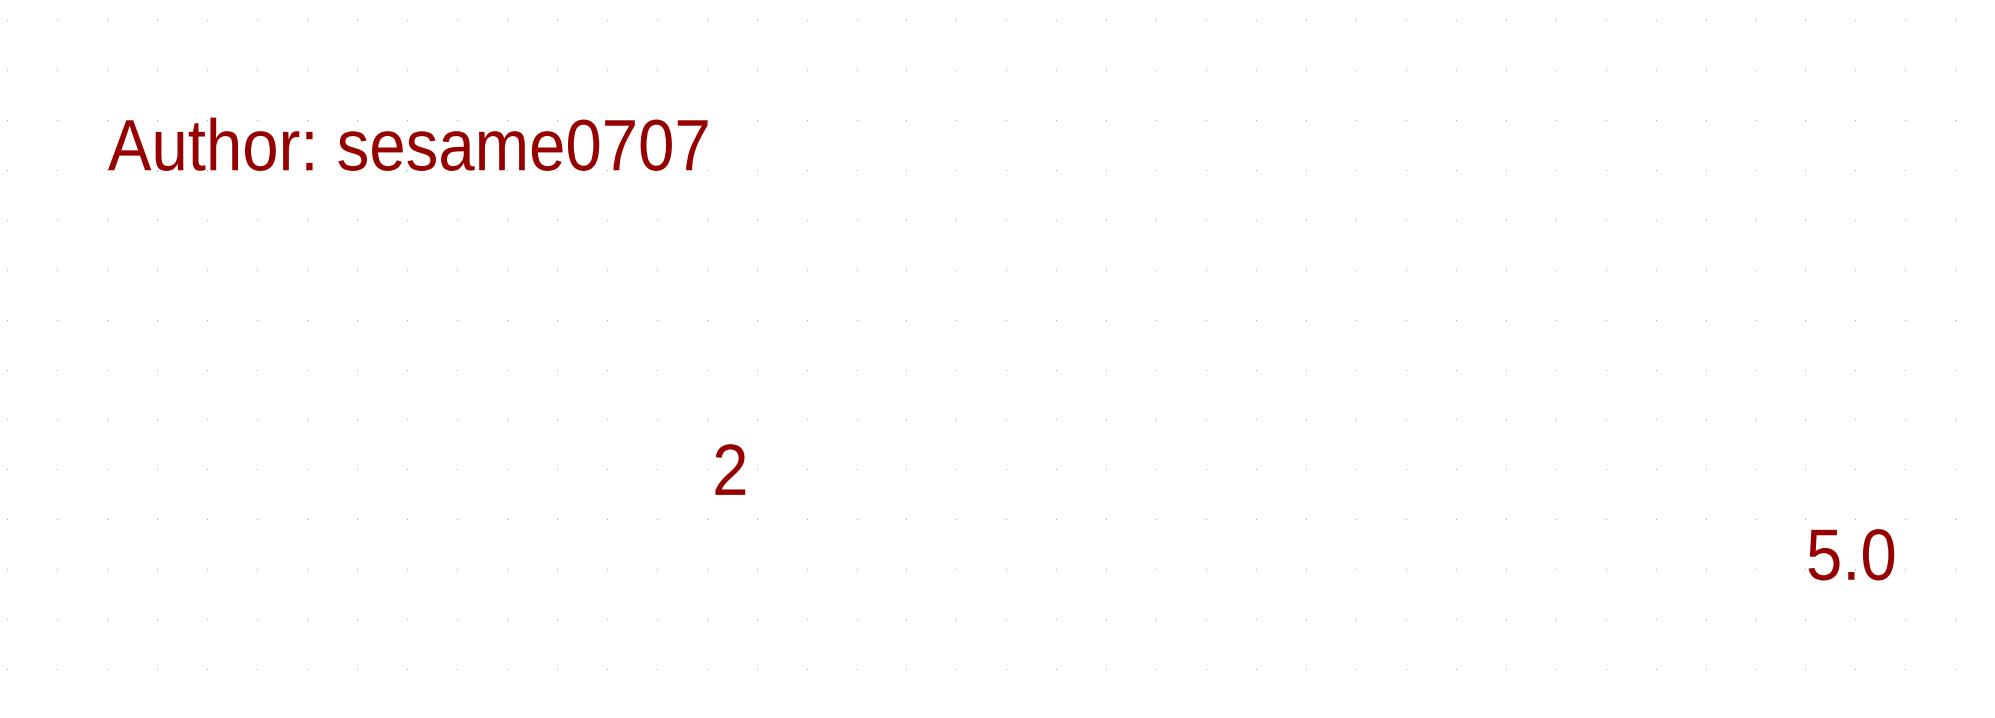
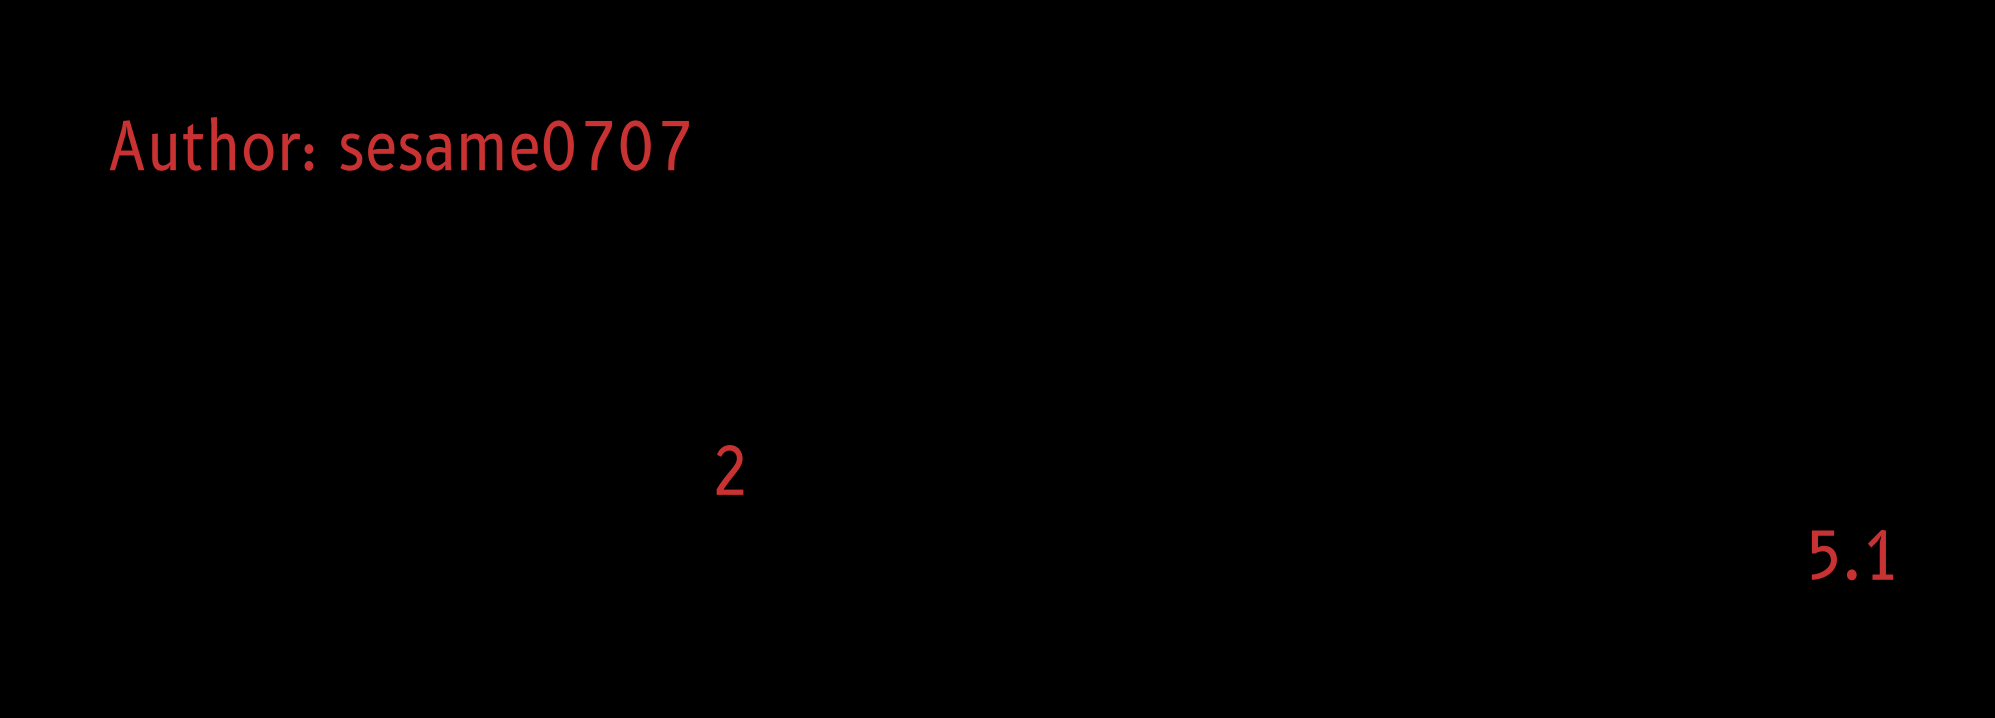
text: 5.0 (1851, 554) -> 5.1 (1852, 555)

